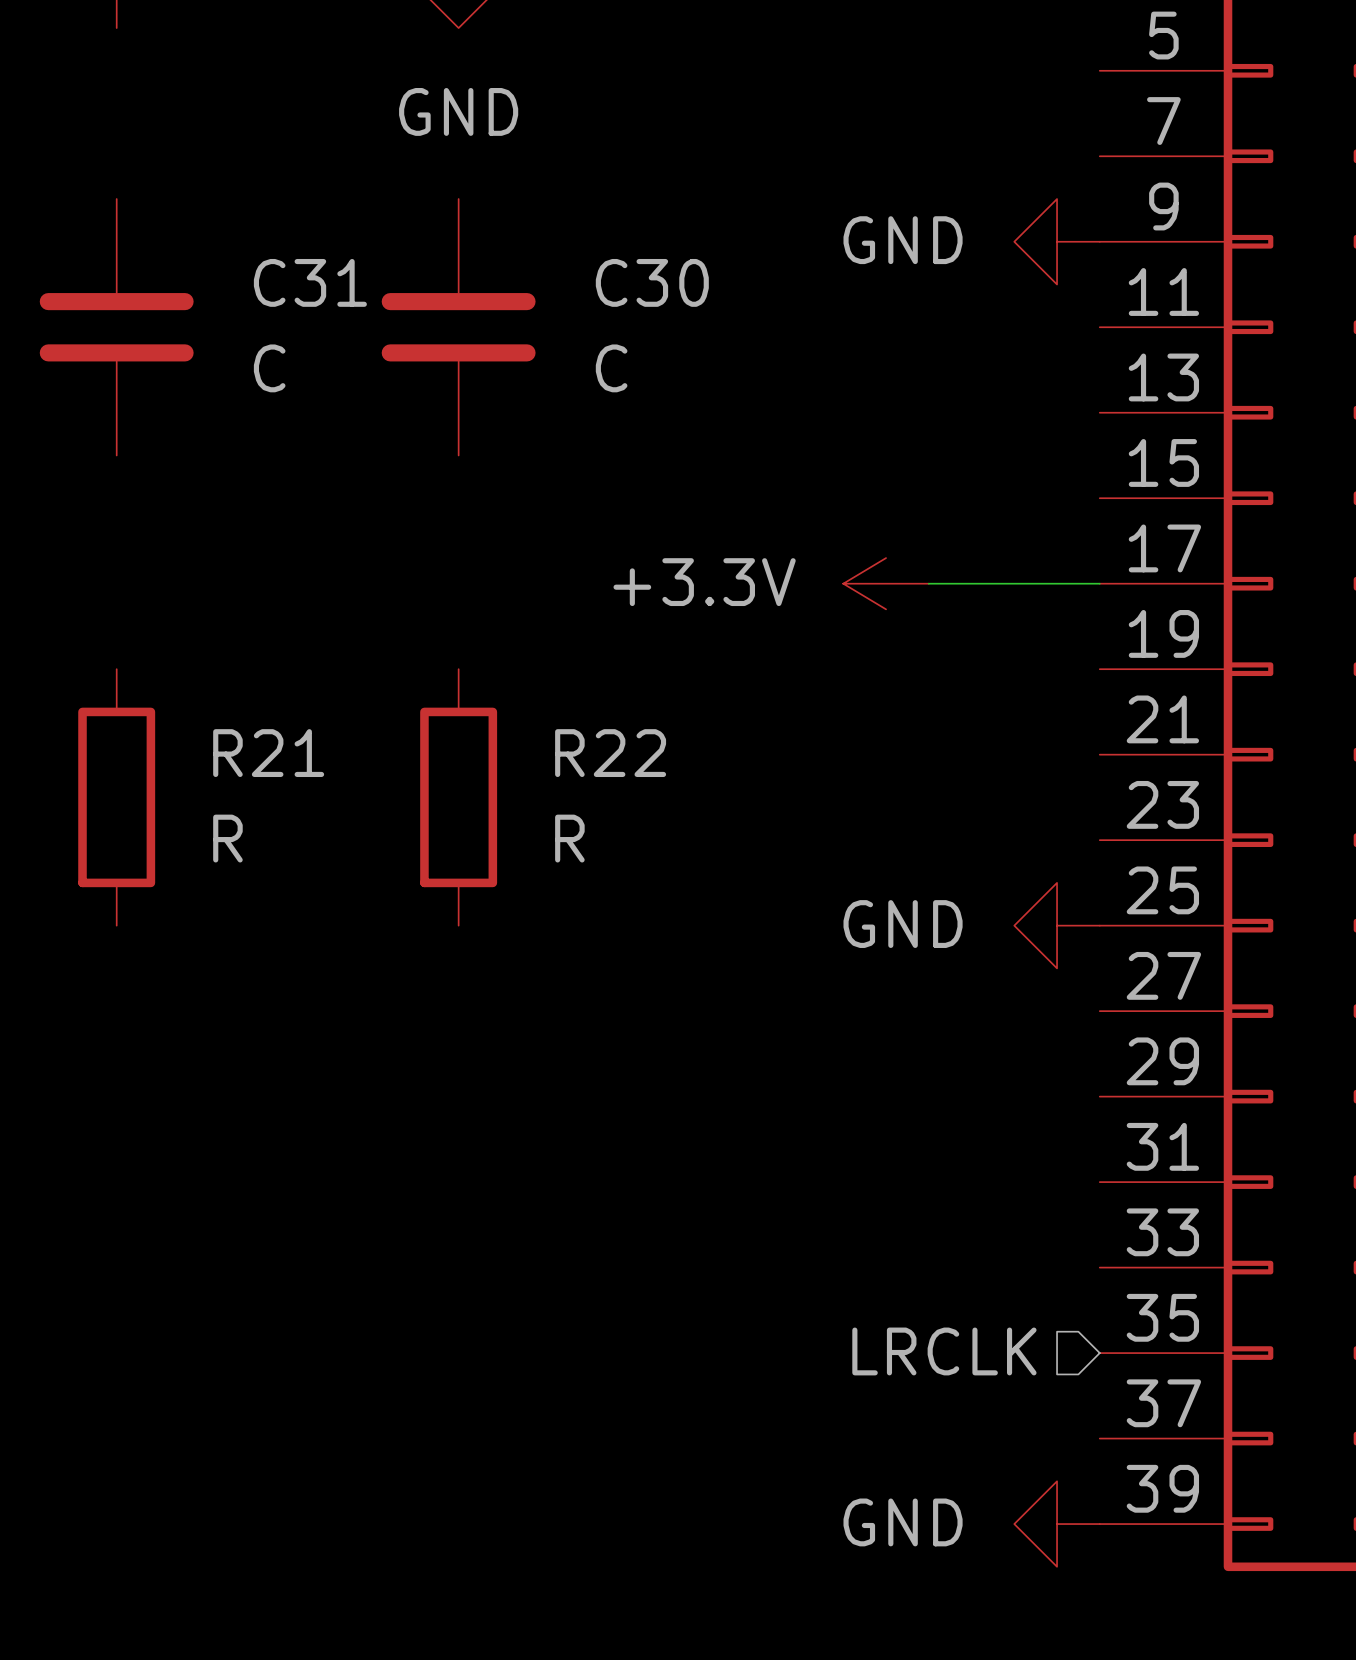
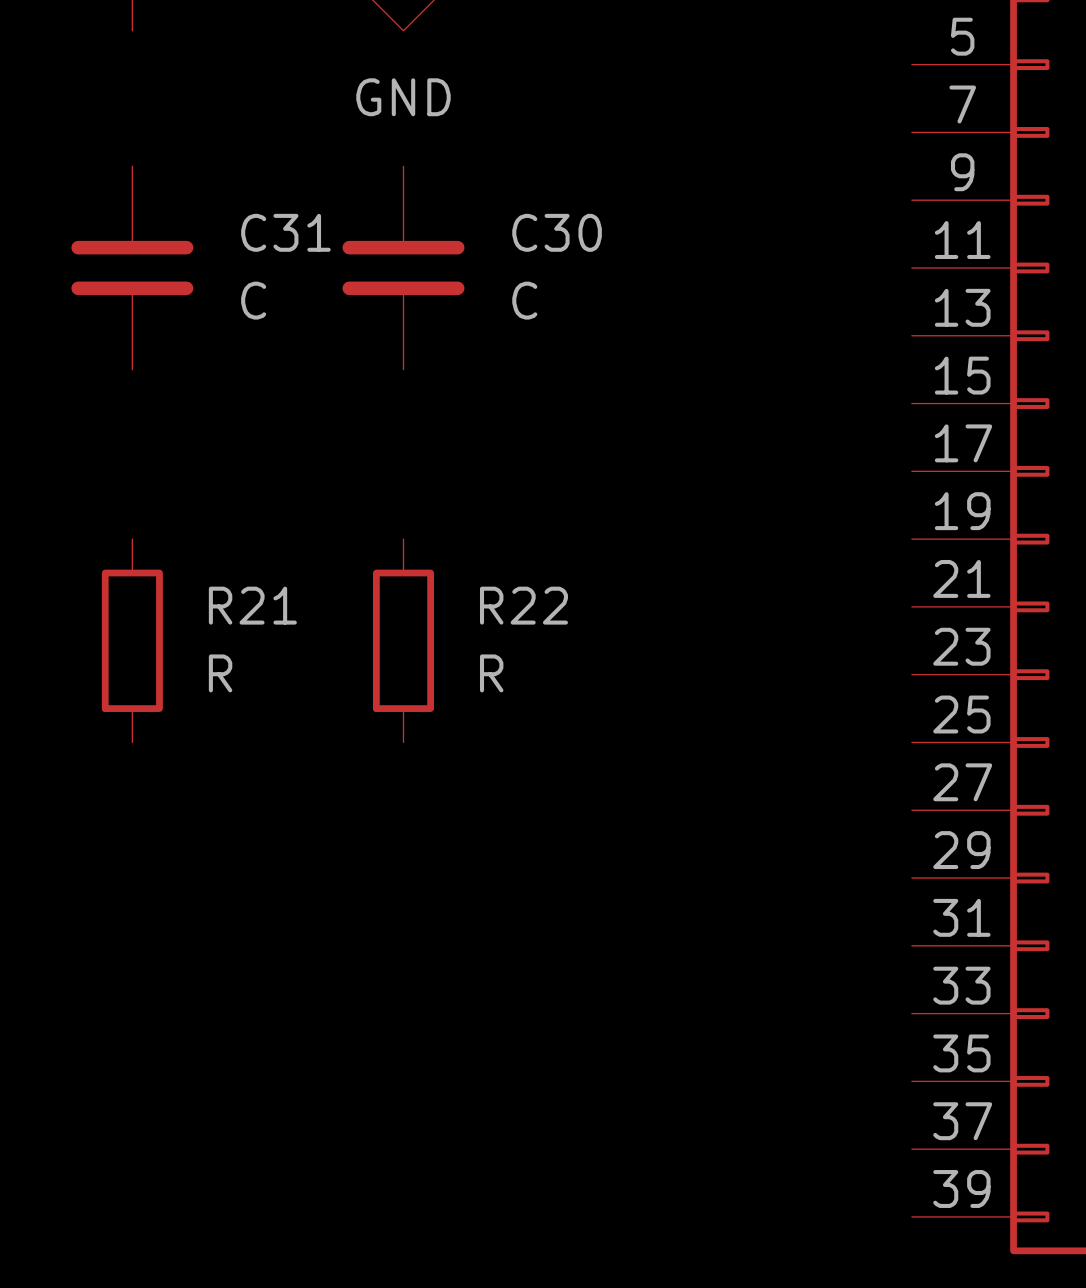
power symbol: GND (1057, 241) -> none
power symbol: +3.3V (886, 583) -> none
wire: (928, 583) (1099, 583) -> none
power symbol: GND (1057, 925) -> none
hierarchical label: LRCLK (944, 1351) -> none
power symbol: GND (1057, 1524) -> none

